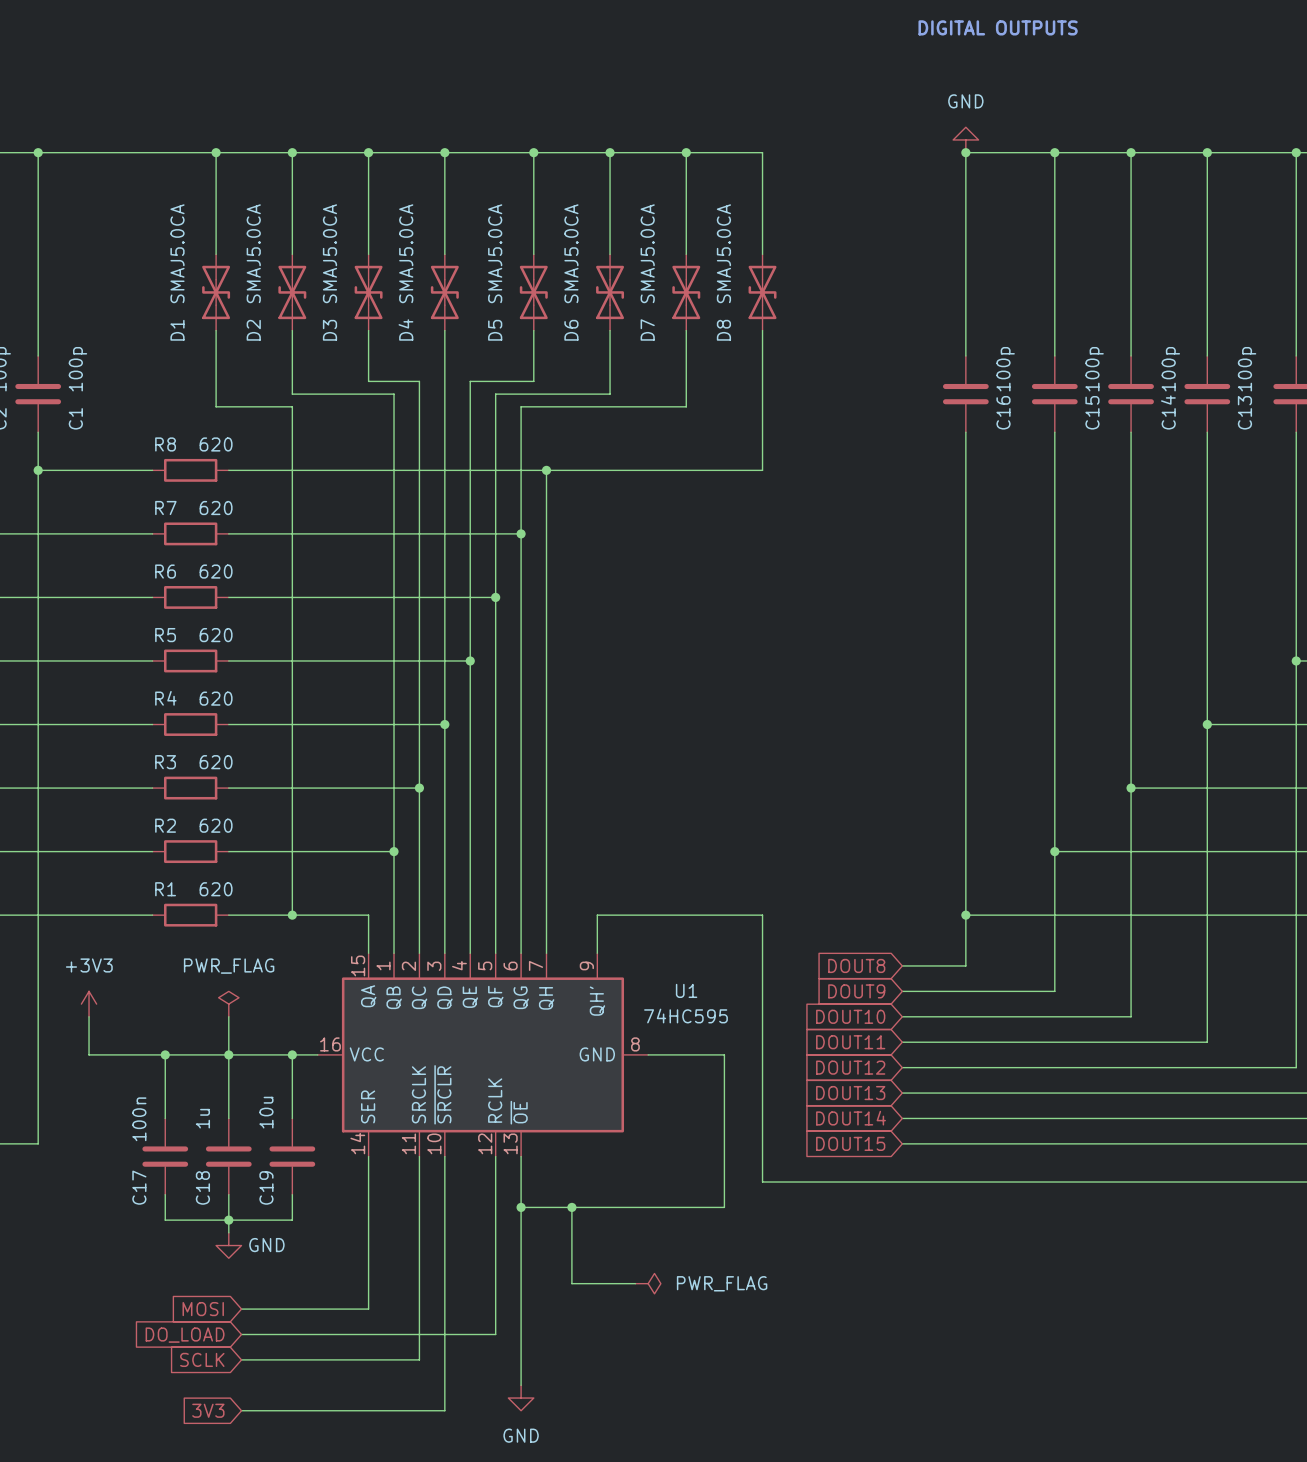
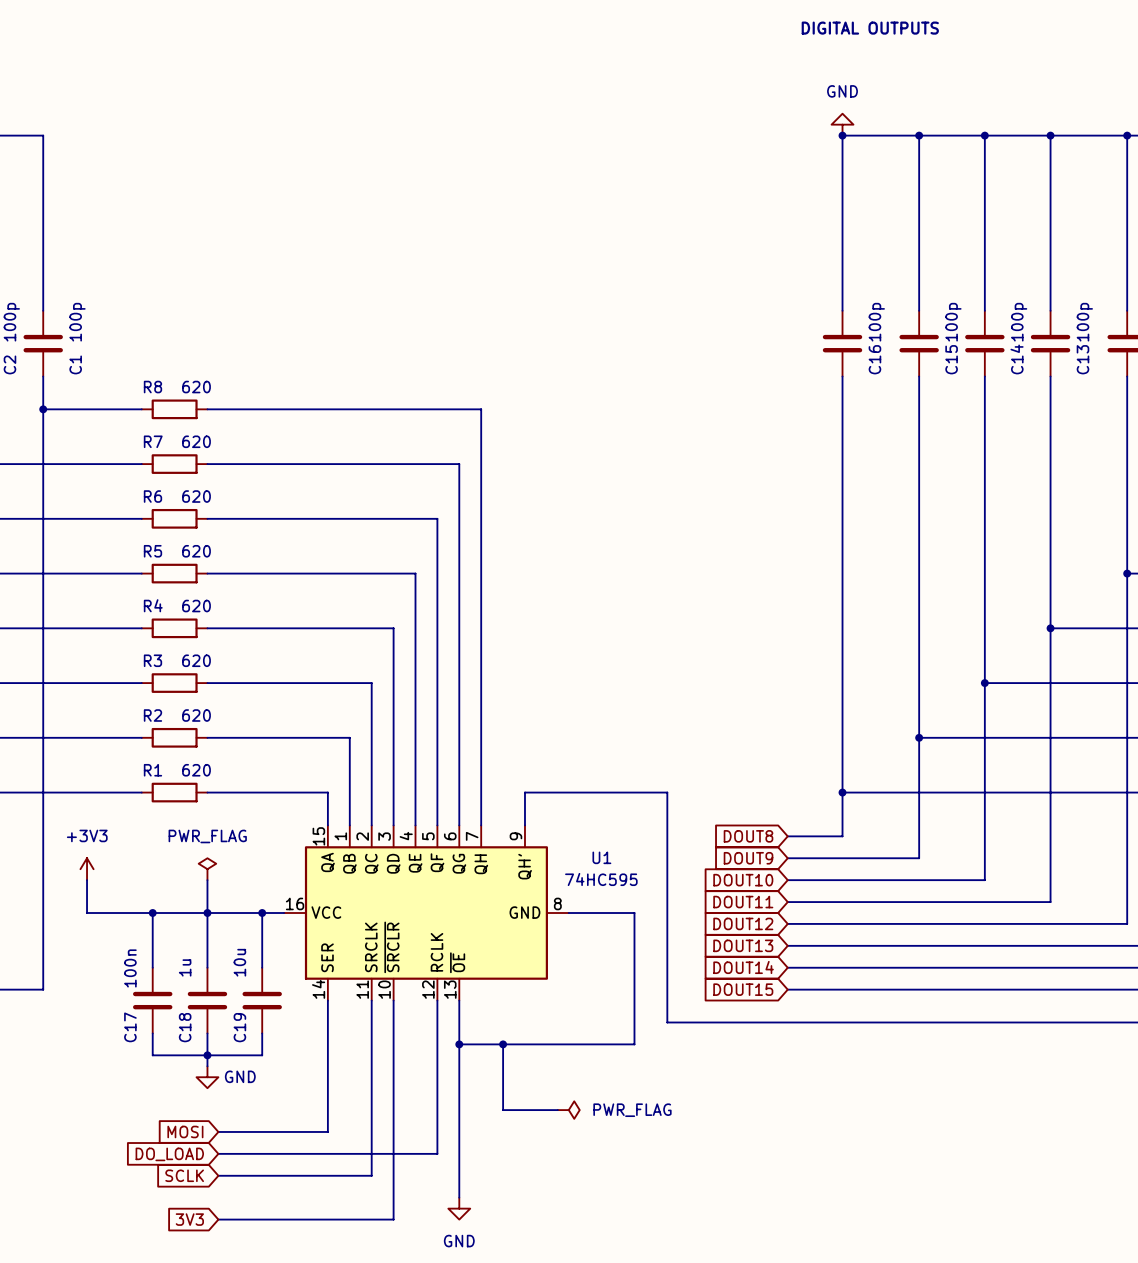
wire: (38, 152) (762, 152) (762, 254) -> none
junction: (38, 152) -> none
wire: (216, 152) (216, 254) -> none
junction: (216, 152) -> none
wire: (292, 152) (292, 254) -> none
junction: (292, 152) -> none
wire: (368, 152) (368, 254) -> none
junction: (368, 152) -> none
wire: (444, 152) (444, 254) -> none
junction: (444, 152) -> none
wire: (533, 152) (533, 254) -> none
junction: (533, 152) -> none
wire: (610, 152) (610, 254) -> none
junction: (610, 152) -> none
wire: (686, 152) (686, 254) -> none
junction: (686, 152) -> none
D1: SMAJ5.0CA (216, 292) -> none
D2: SMAJ5.0CA (292, 292) -> none
D3: SMAJ5.0CA (368, 292) -> none
D4: SMAJ5.0CA (444, 292) -> none
D5: SMAJ5.0CA (533, 292) -> none
D6: SMAJ5.0CA (610, 292) -> none
D7: SMAJ5.0CA (686, 292) -> none
D8: SMAJ5.0CA (762, 292) -> none
wire: (216, 330) (216, 406) (292, 406) (292, 915) -> none
wire: (292, 330) (292, 394) (394, 394) (394, 851) -> none
wire: (368, 330) (368, 381) (419, 381) (419, 788) -> none
wire: (444, 330) (444, 724) -> none
wire: (533, 330) (533, 381) (470, 381) (470, 660) -> none
wire: (610, 330) (610, 394) (495, 394) (495, 597) -> none
wire: (686, 330) (686, 406) (521, 406) (521, 533) -> none
wire: (762, 330) (762, 470) (546, 470) -> none
junction: (546, 470) -> none
junction: (521, 533) -> none
junction: (495, 597) -> none
junction: (470, 660) -> none
junction: (444, 724) -> none
junction: (419, 788) -> none
junction: (394, 851) -> none
junction: (292, 915) -> none

